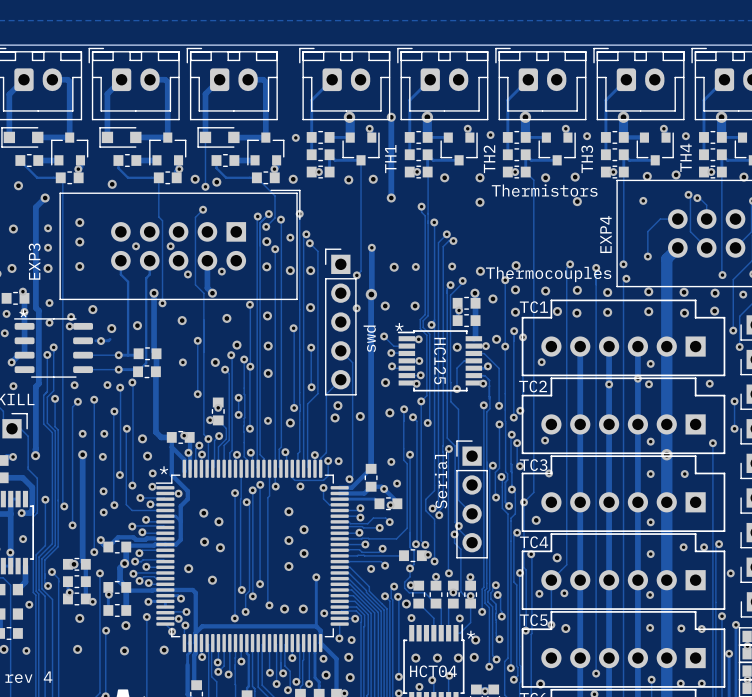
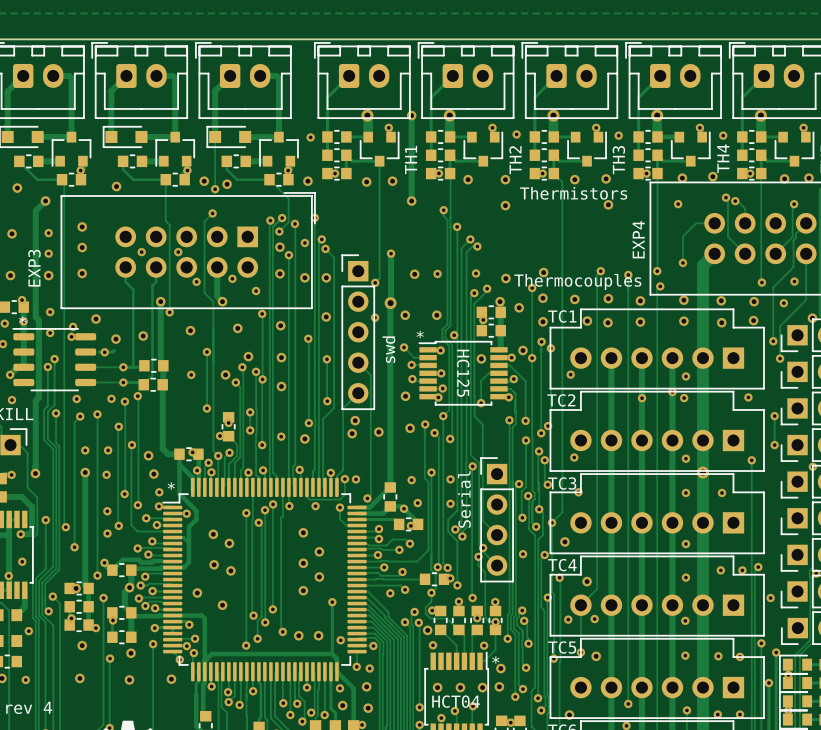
via: none -> (256, 291)
via: none -> (450, 479)
via: none -> (450, 503)
via: none -> (523, 554)

